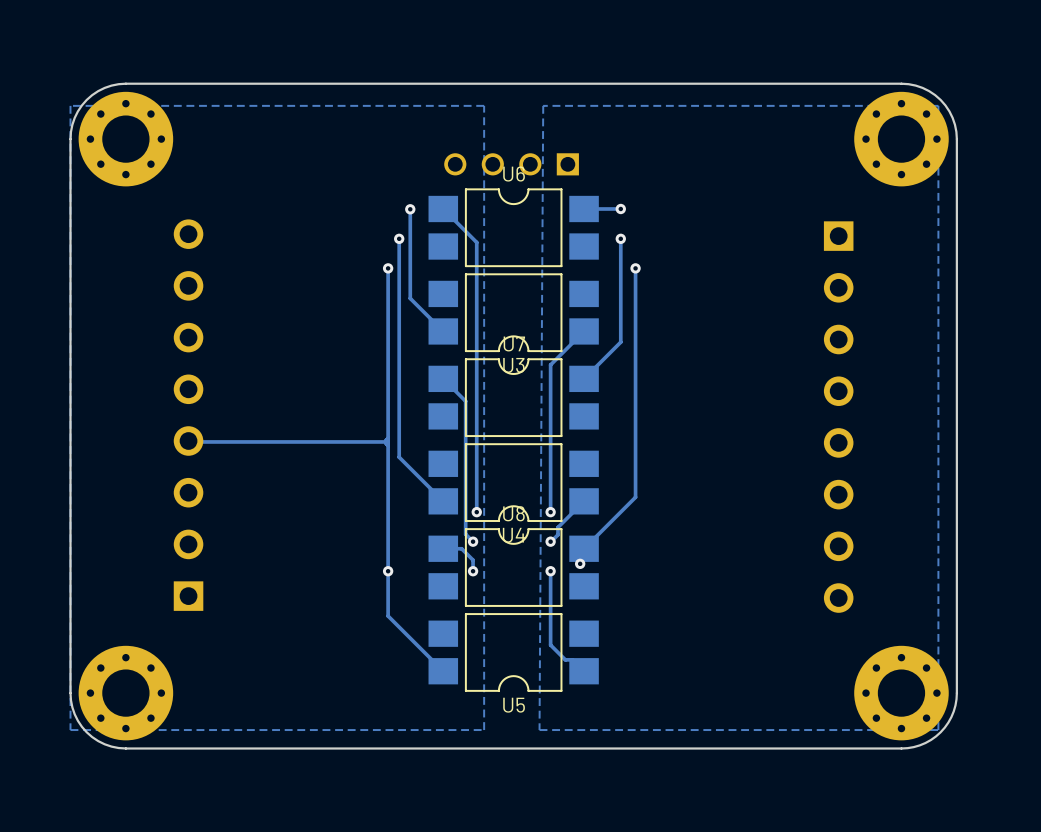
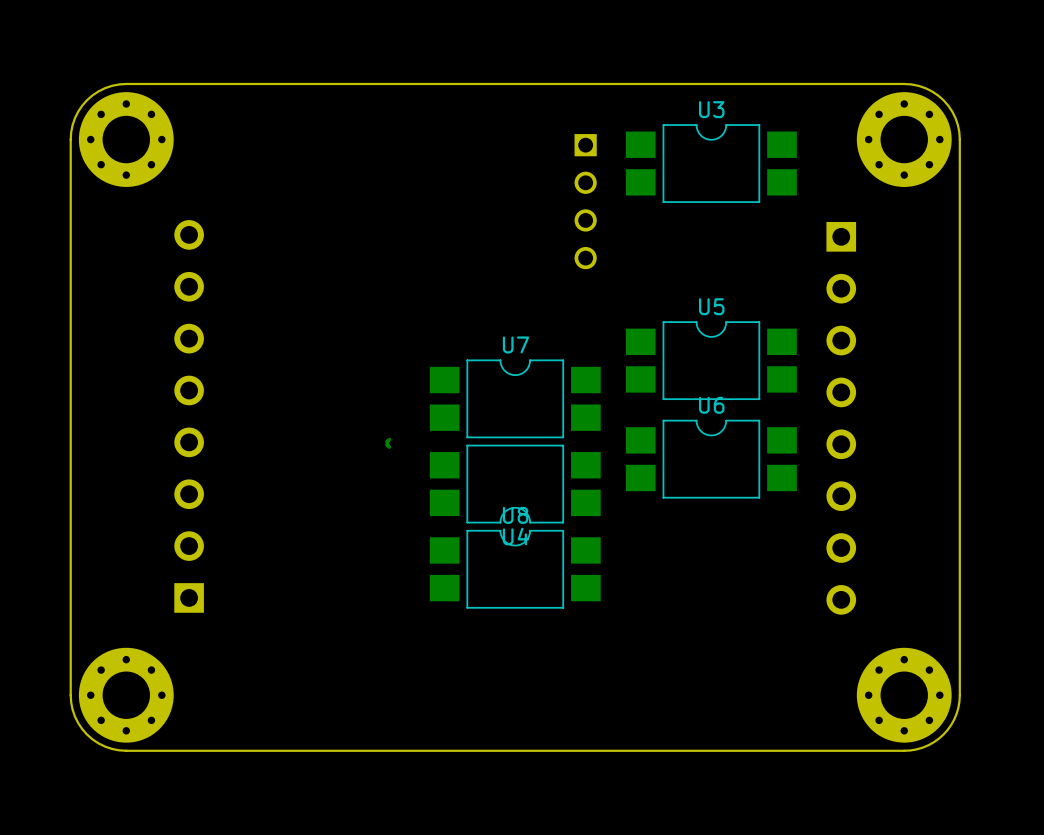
zone outline: (484, 105) (70, 105) (70, 730) (484, 730) (484, 105) -> none
zone outline: (938, 105) (543, 105) (539, 730) (938, 730) (938, 105) -> none
part rotation: 0° (511, 164) -> 90° counterclockwise (585, 201)
part position: (511, 164) -> (585, 201)
track: (443, 208) (476, 242) (476, 512) -> none
track: (620, 208) (584, 208) -> none
via: (620, 208) -> none
track: (410, 209) (410, 298) (443, 331) -> none
via: (410, 209) -> none
U6 position: (513, 227) -> (711, 459)
track: (399, 238) (399, 457) (443, 501) -> none
via: (399, 238) -> none
track: (620, 238) (620, 342) (584, 378) -> none
via: (620, 238) -> none
track: (388, 268) (388, 616) (443, 671) -> none
via: (388, 268) -> none
track: (635, 268) (635, 497) (584, 548) (584, 559) (580, 563) -> none
via: (635, 268) -> none
U3 rotation: 0° (513, 312) -> 180° (711, 163)
U3 position: (513, 312) -> (711, 163)
track: (584, 331) (550, 364) (550, 512) -> none
track: (443, 378) (465, 401) (465, 534) (473, 541) -> none
track: (188, 441) (386, 441) -> none
track: (584, 501) (558, 527) (558, 534) (550, 541) -> none
via: (476, 512) -> none
via: (550, 512) -> none
via: (473, 541) -> none
via: (550, 541) -> none
track: (443, 548) (461, 548) (473, 560) (473, 571) -> none
via: (580, 563) -> none
via: (388, 571) -> none
via: (473, 571) -> none
track: (550, 571) (550, 645) (565, 659) (572, 659) (584, 671) -> none
via: (550, 571) -> none
U5 rotation: 0° (513, 652) -> 180° (711, 360)
U5 position: (513, 652) -> (711, 360)

